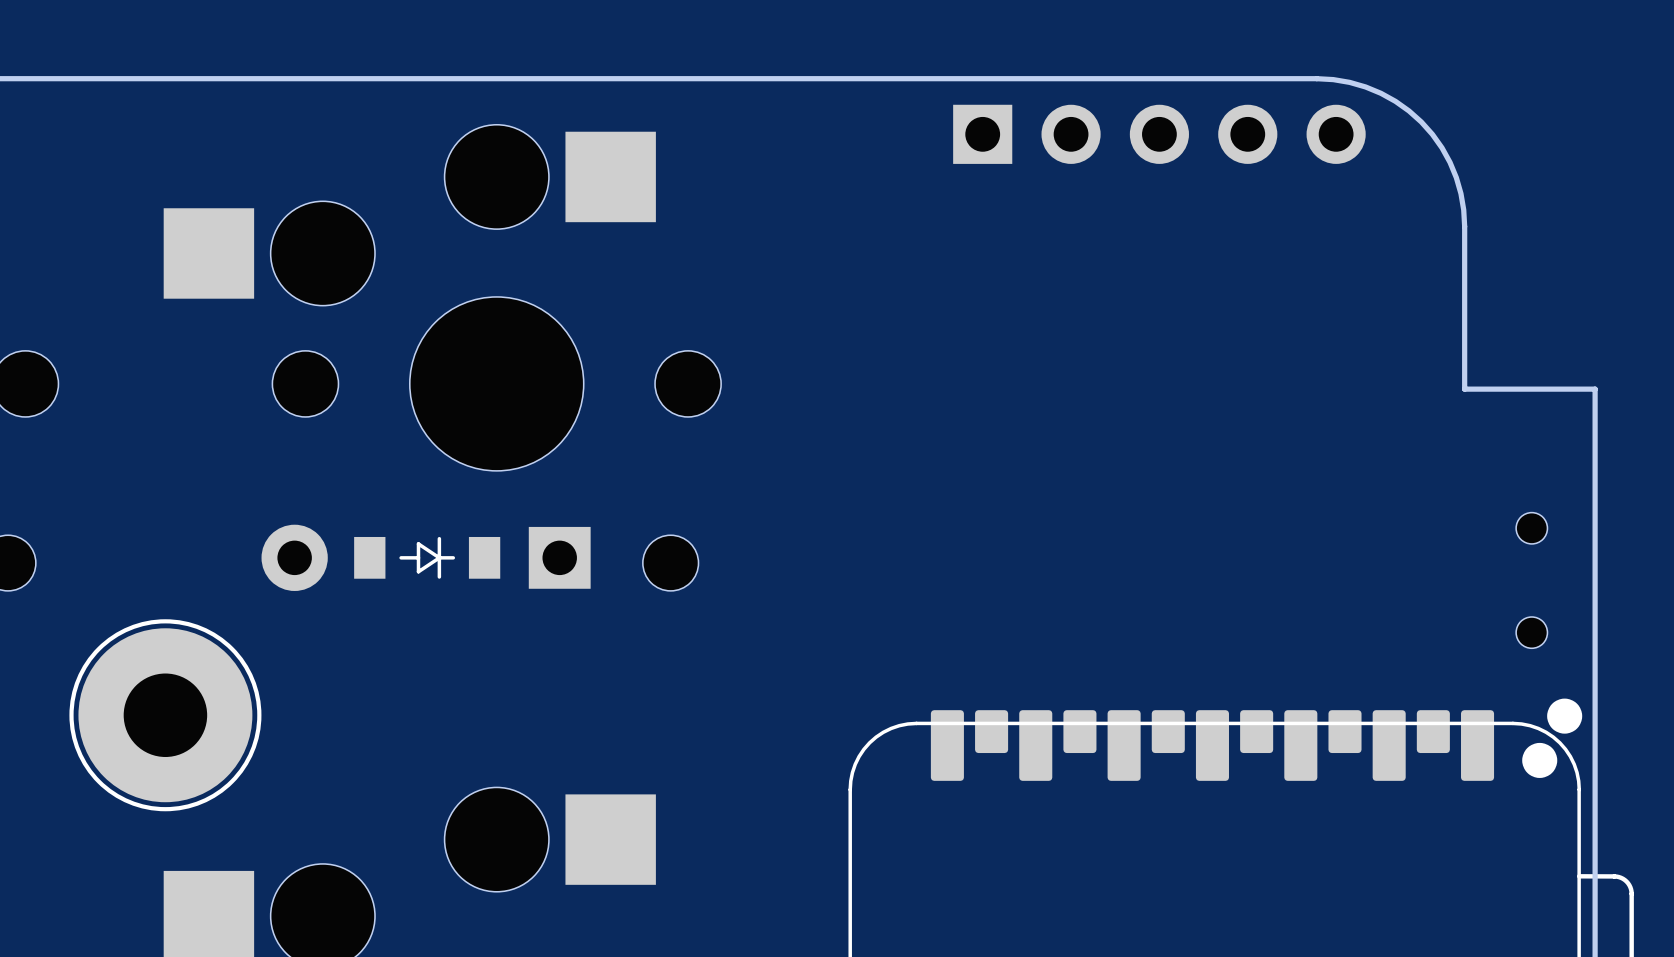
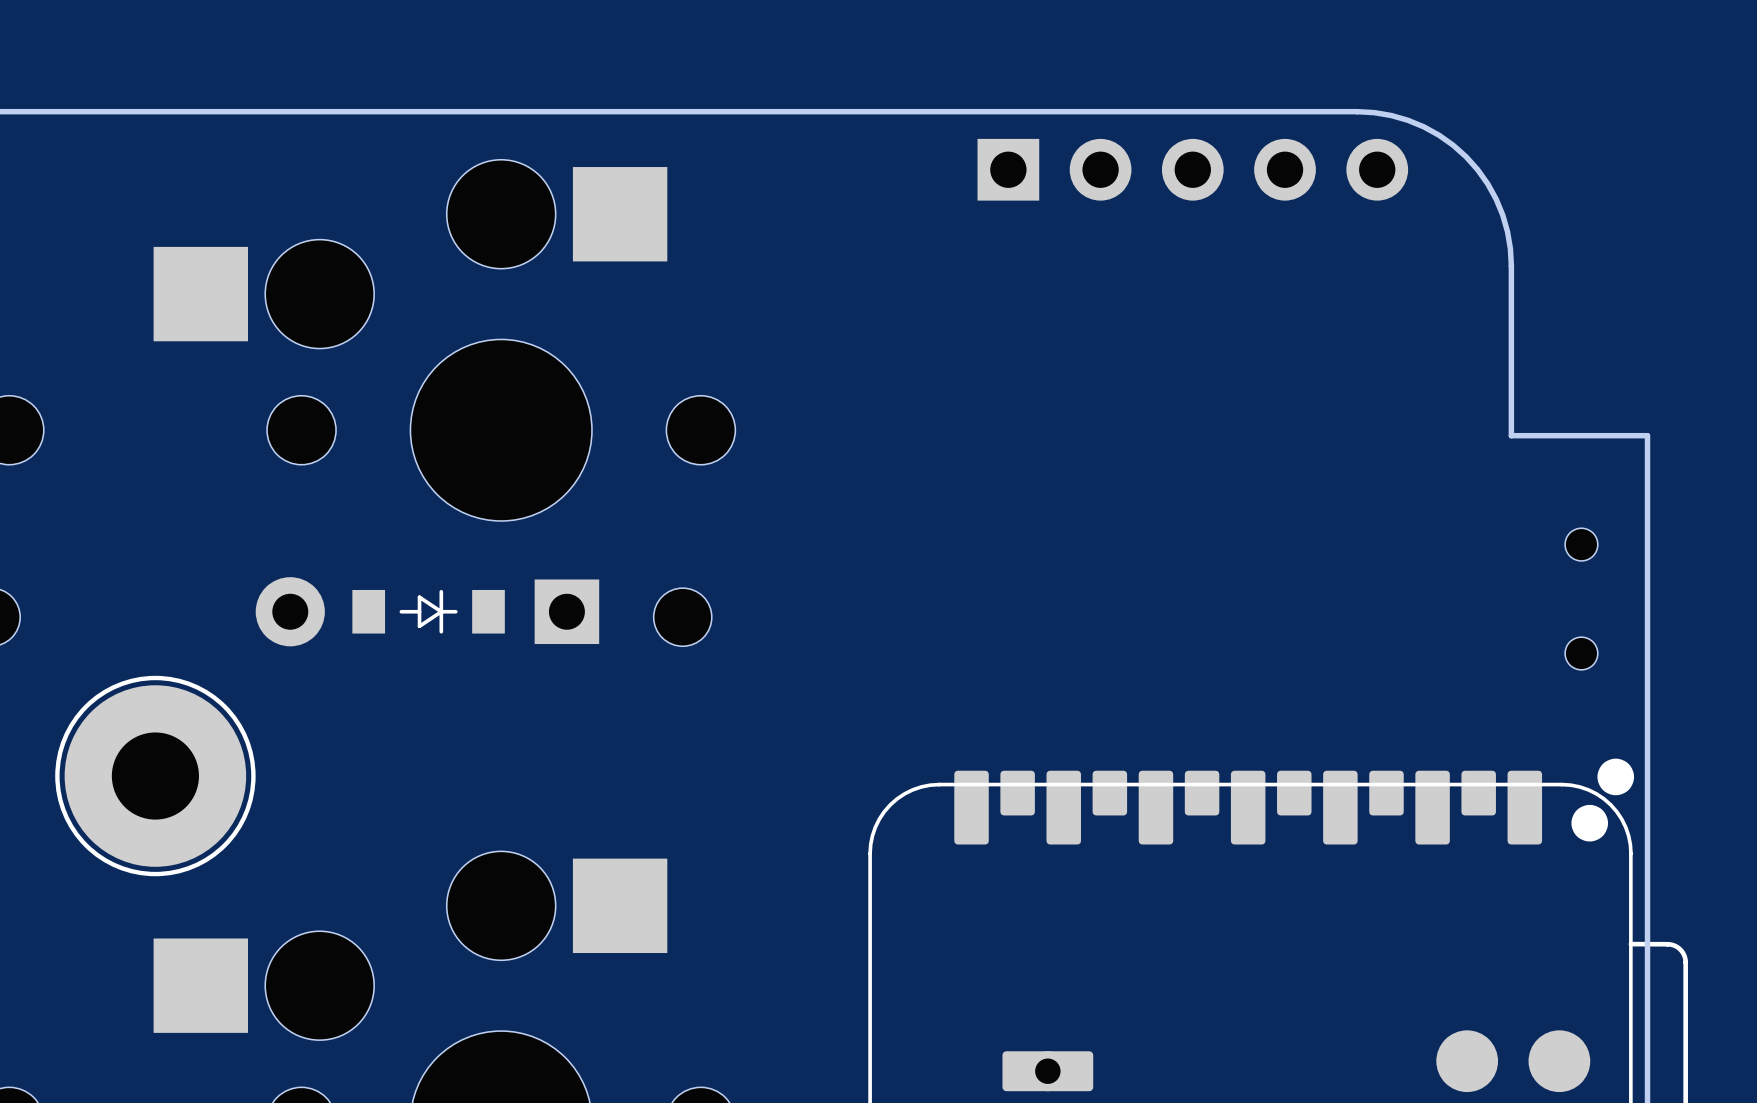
part position: (1531, 580) -> (1581, 599)

